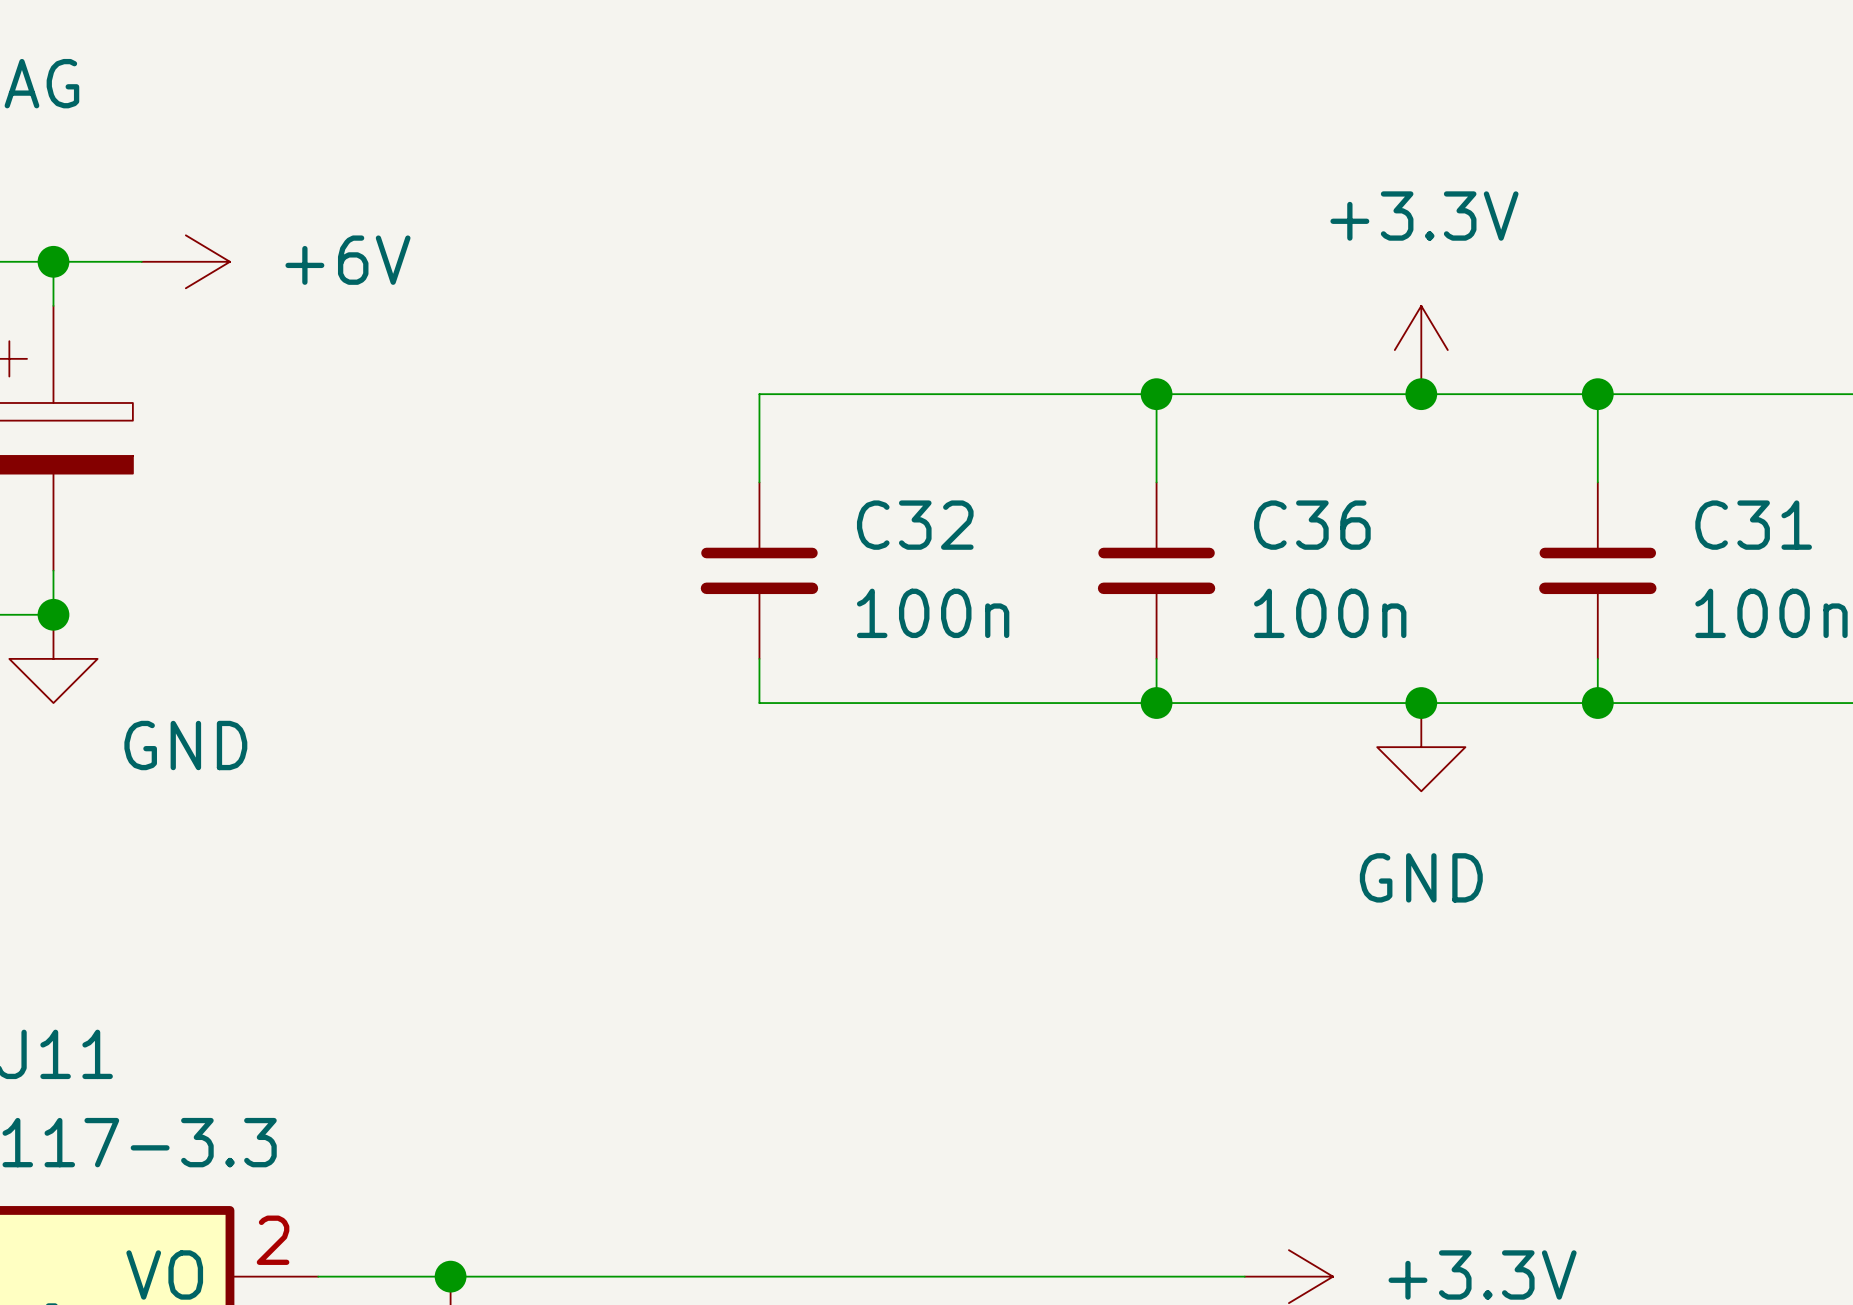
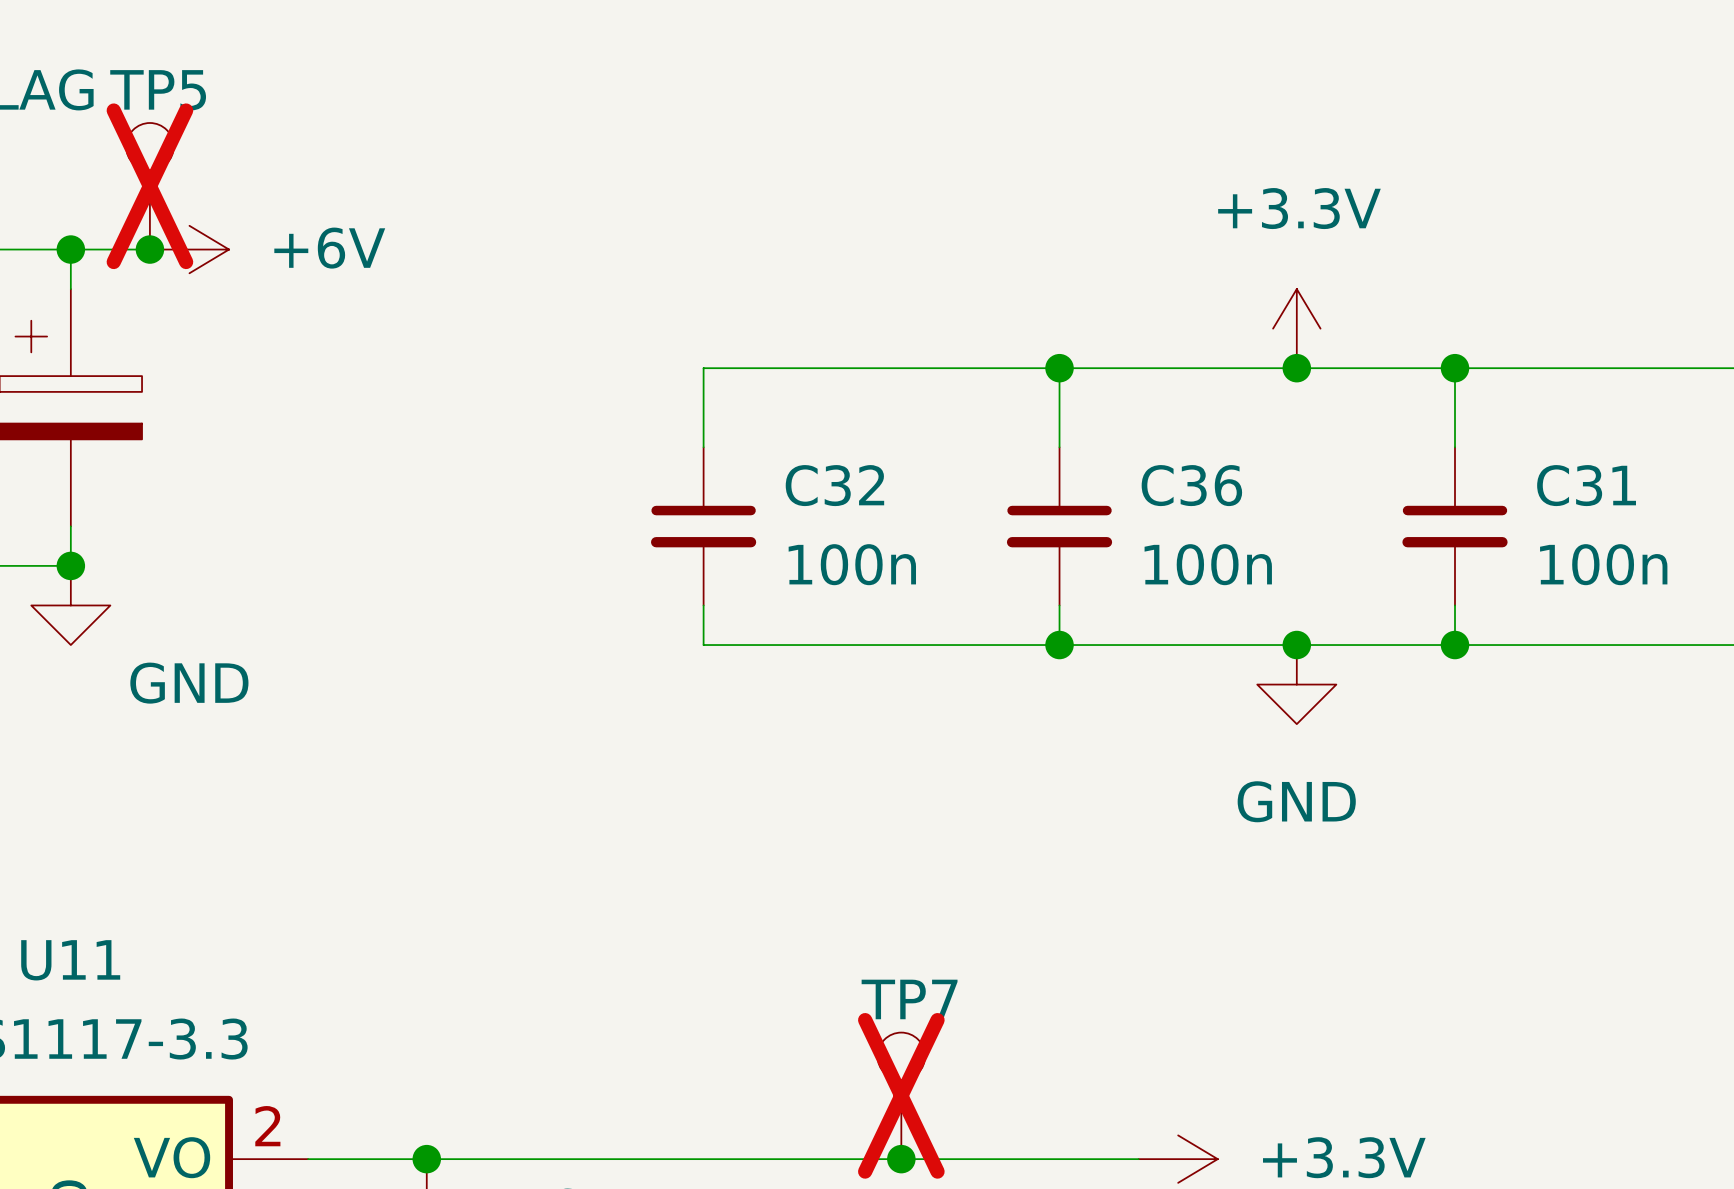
TP5: none -> (149, 186)
junction: none -> (149, 249)
TP7: none -> (901, 1095)
junction: none -> (901, 1159)

